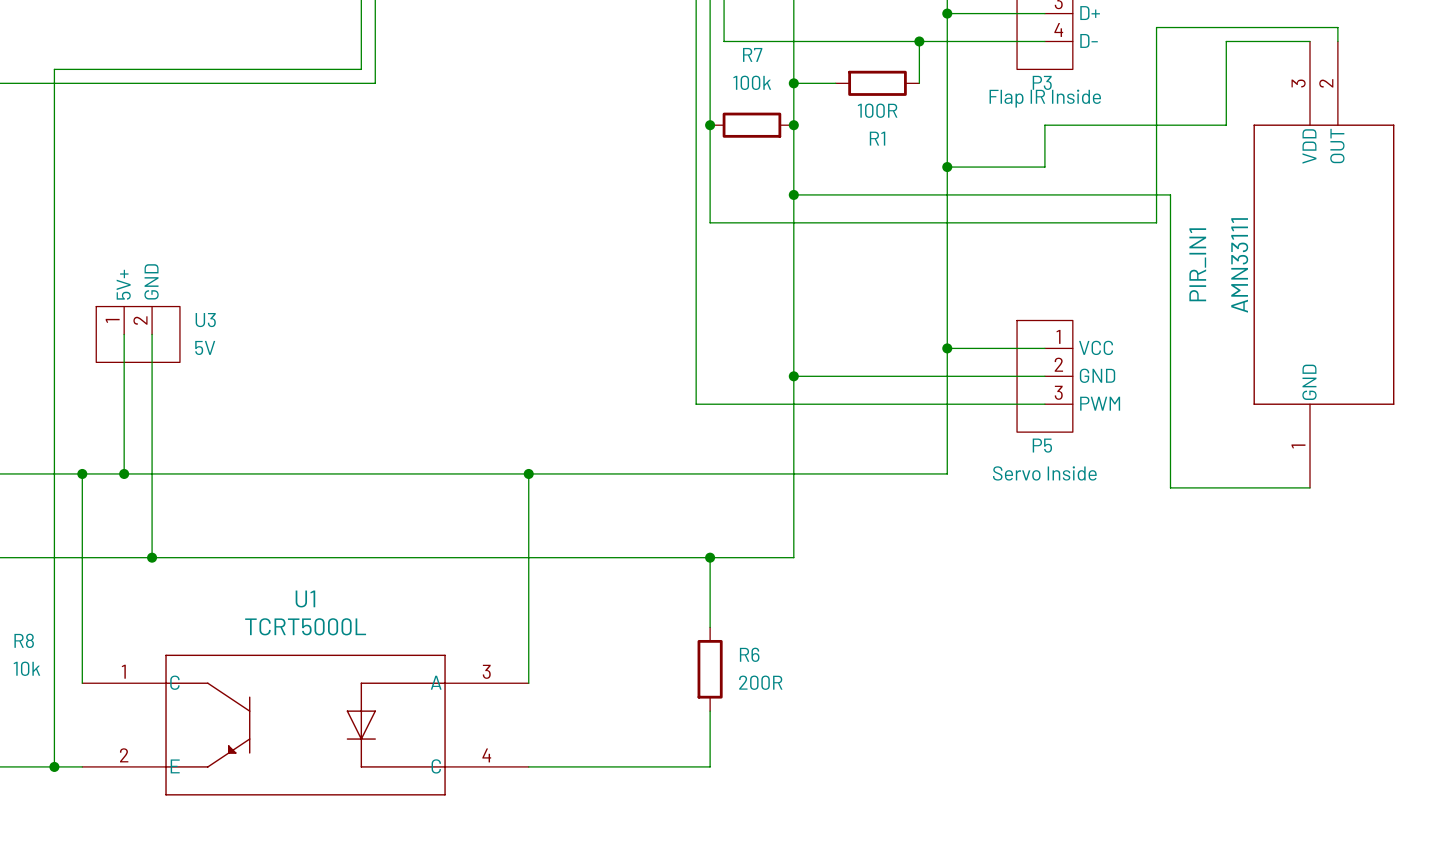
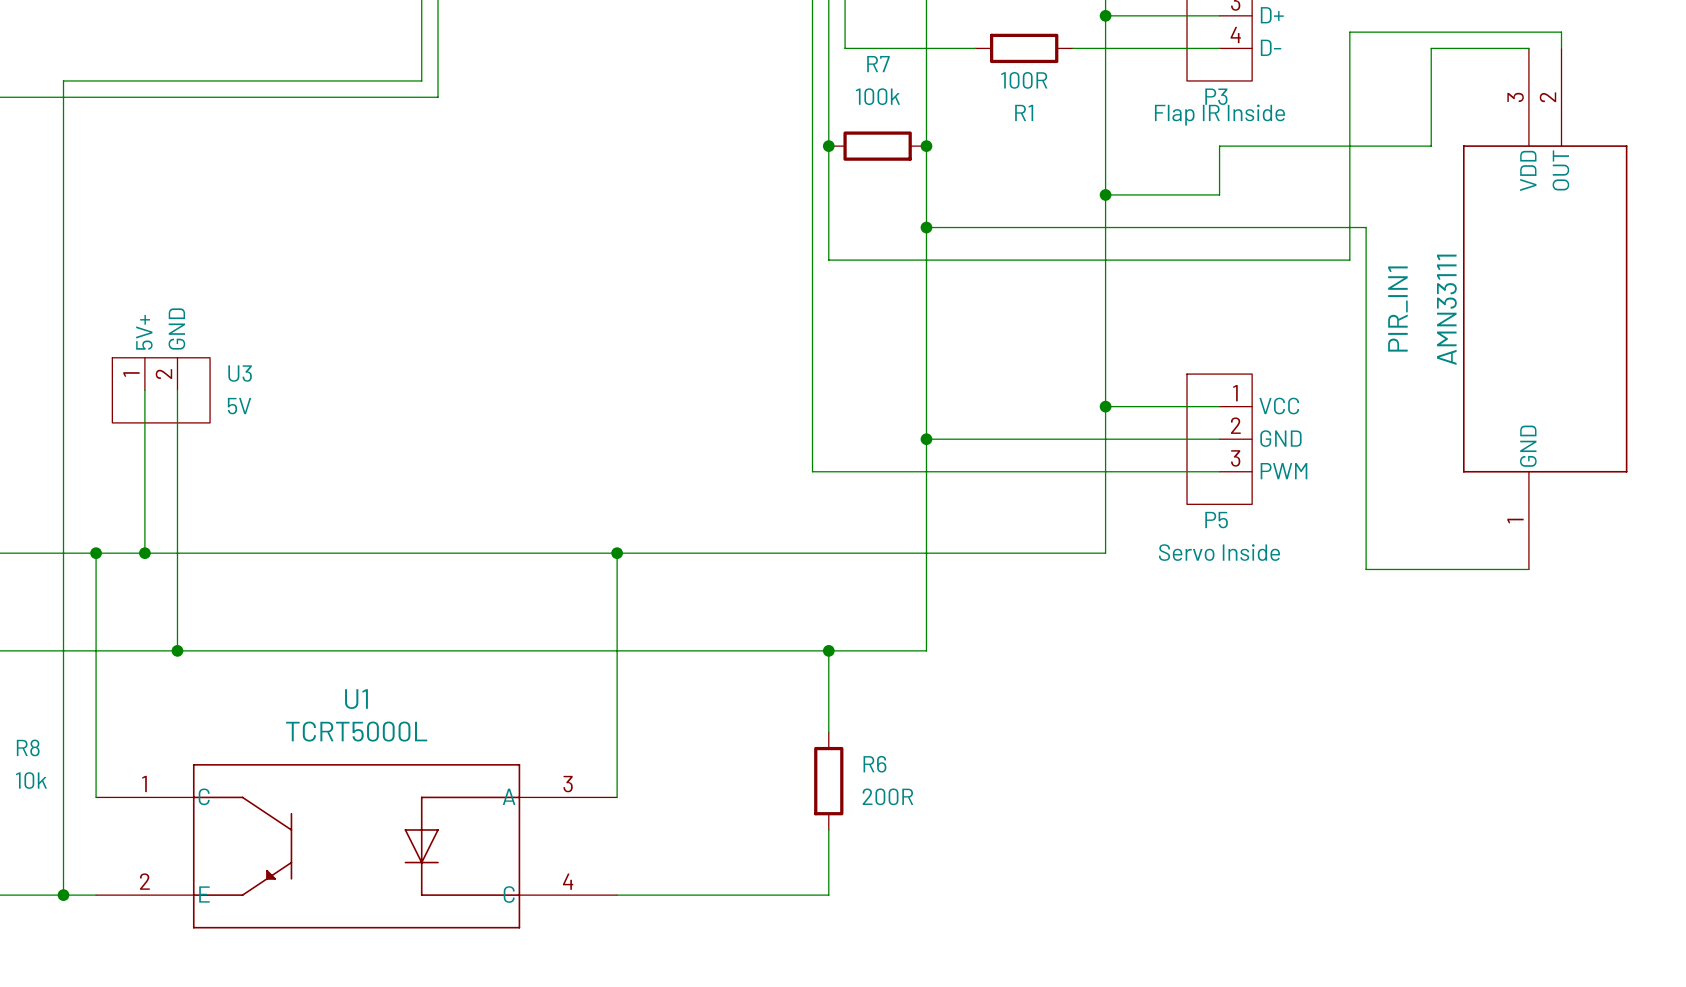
wire: (835, 41) (919, 41) (919, 83) -> none
junction: (919, 41) -> none
wire: (793, 83) (835, 83) -> none
junction: (793, 83) -> none
R1 position: (877, 83) -> (1024, 48)

